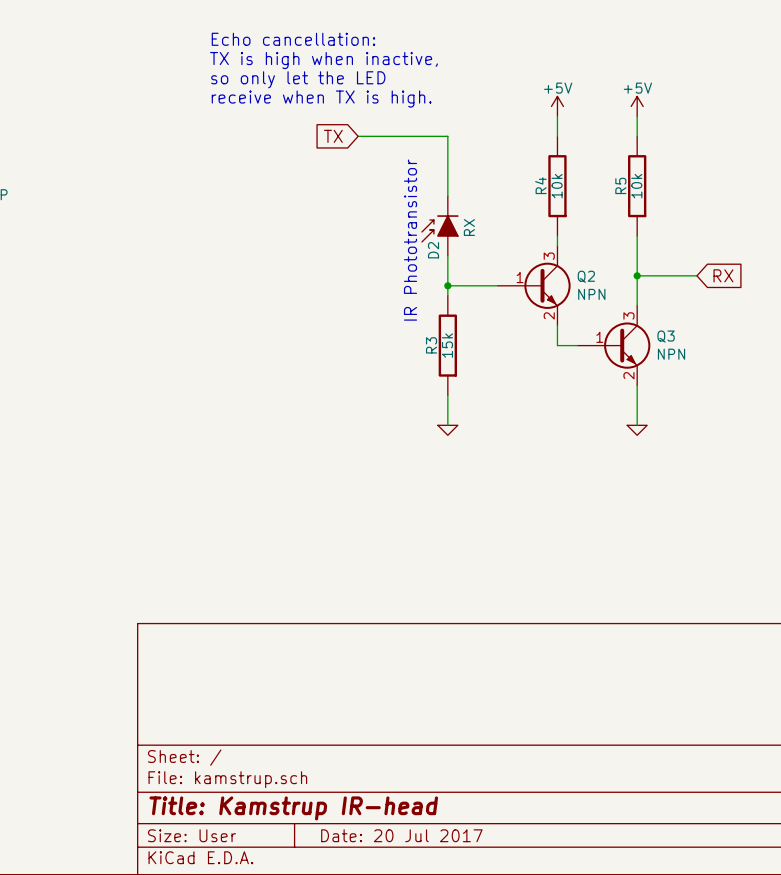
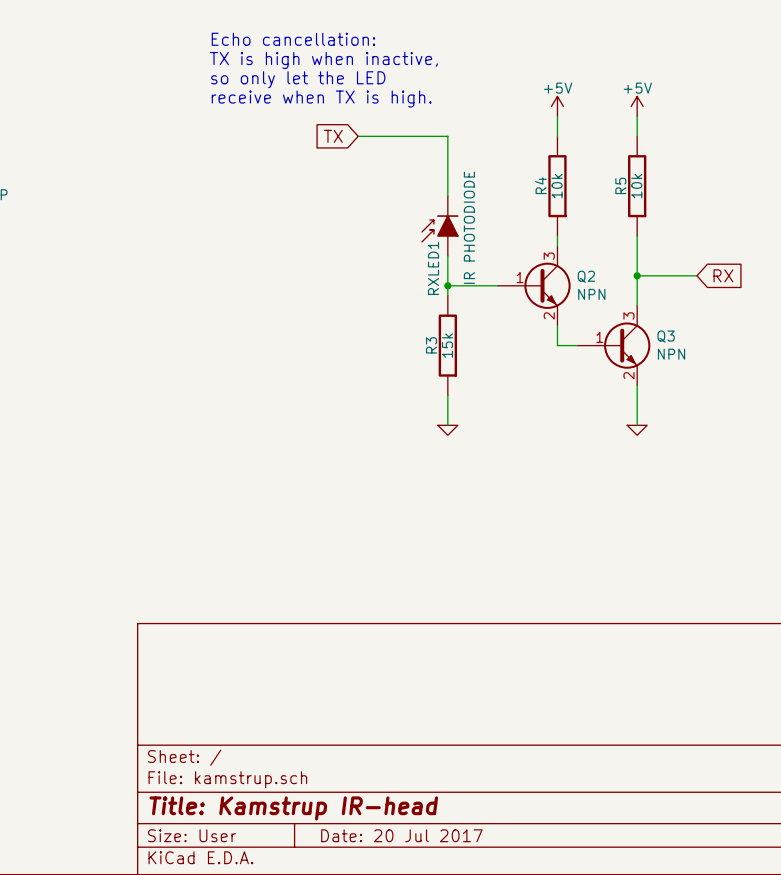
D2 value: RX (469, 227) -> IR PHOTODIODE (469, 227)
text: IR Phototransistor (410, 240) -> none
D2 name: D2 (433, 250) -> RXLED1 (433, 268)

